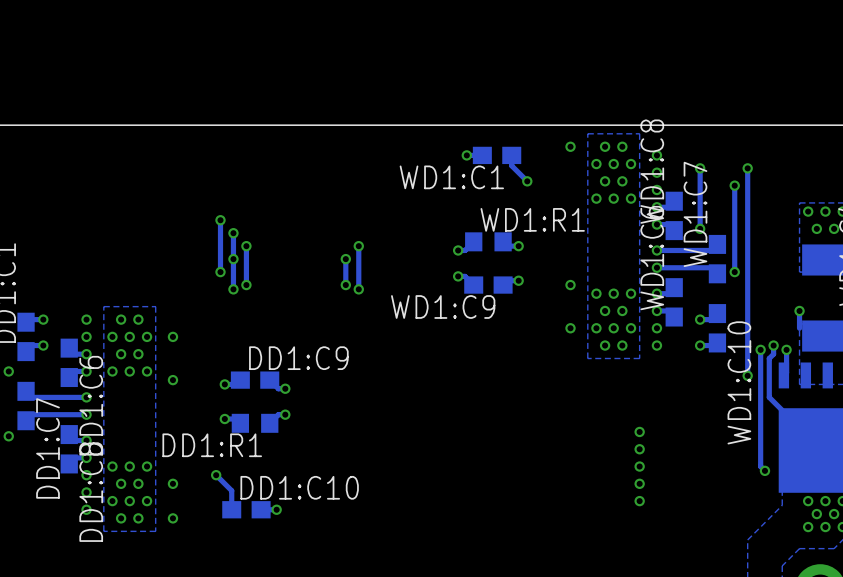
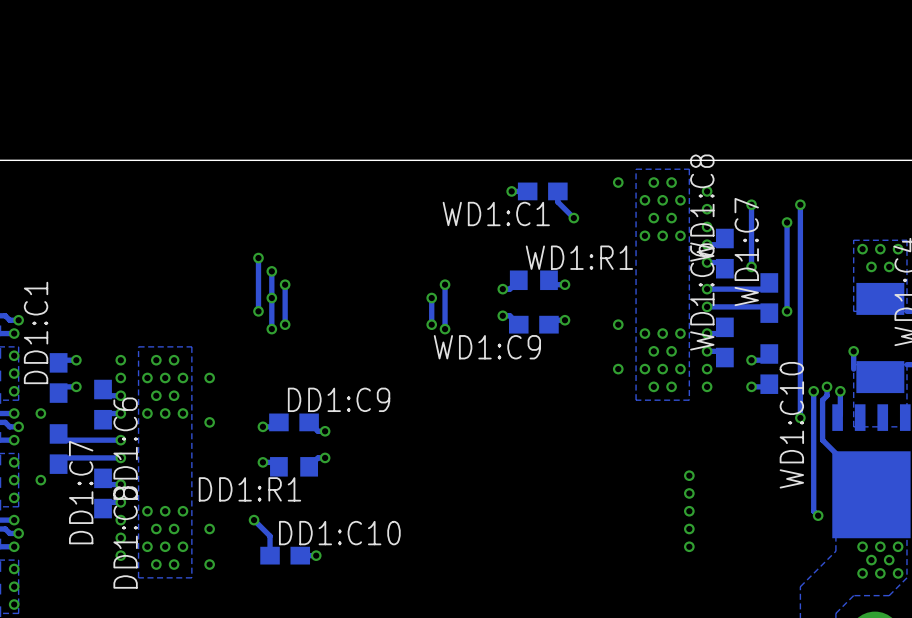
track: (358, 246) (358, 289) -> (445, 284) (445, 329)
via: (358, 246) -> none
via: none -> (445, 284)
track: (345, 259) (345, 285) -> (431, 298) (431, 324)
via: (345, 259) -> none
via: none -> (431, 298)
via: (345, 285) -> none
via: none -> (431, 324)
via: (358, 289) -> none
via: none -> (445, 329)

